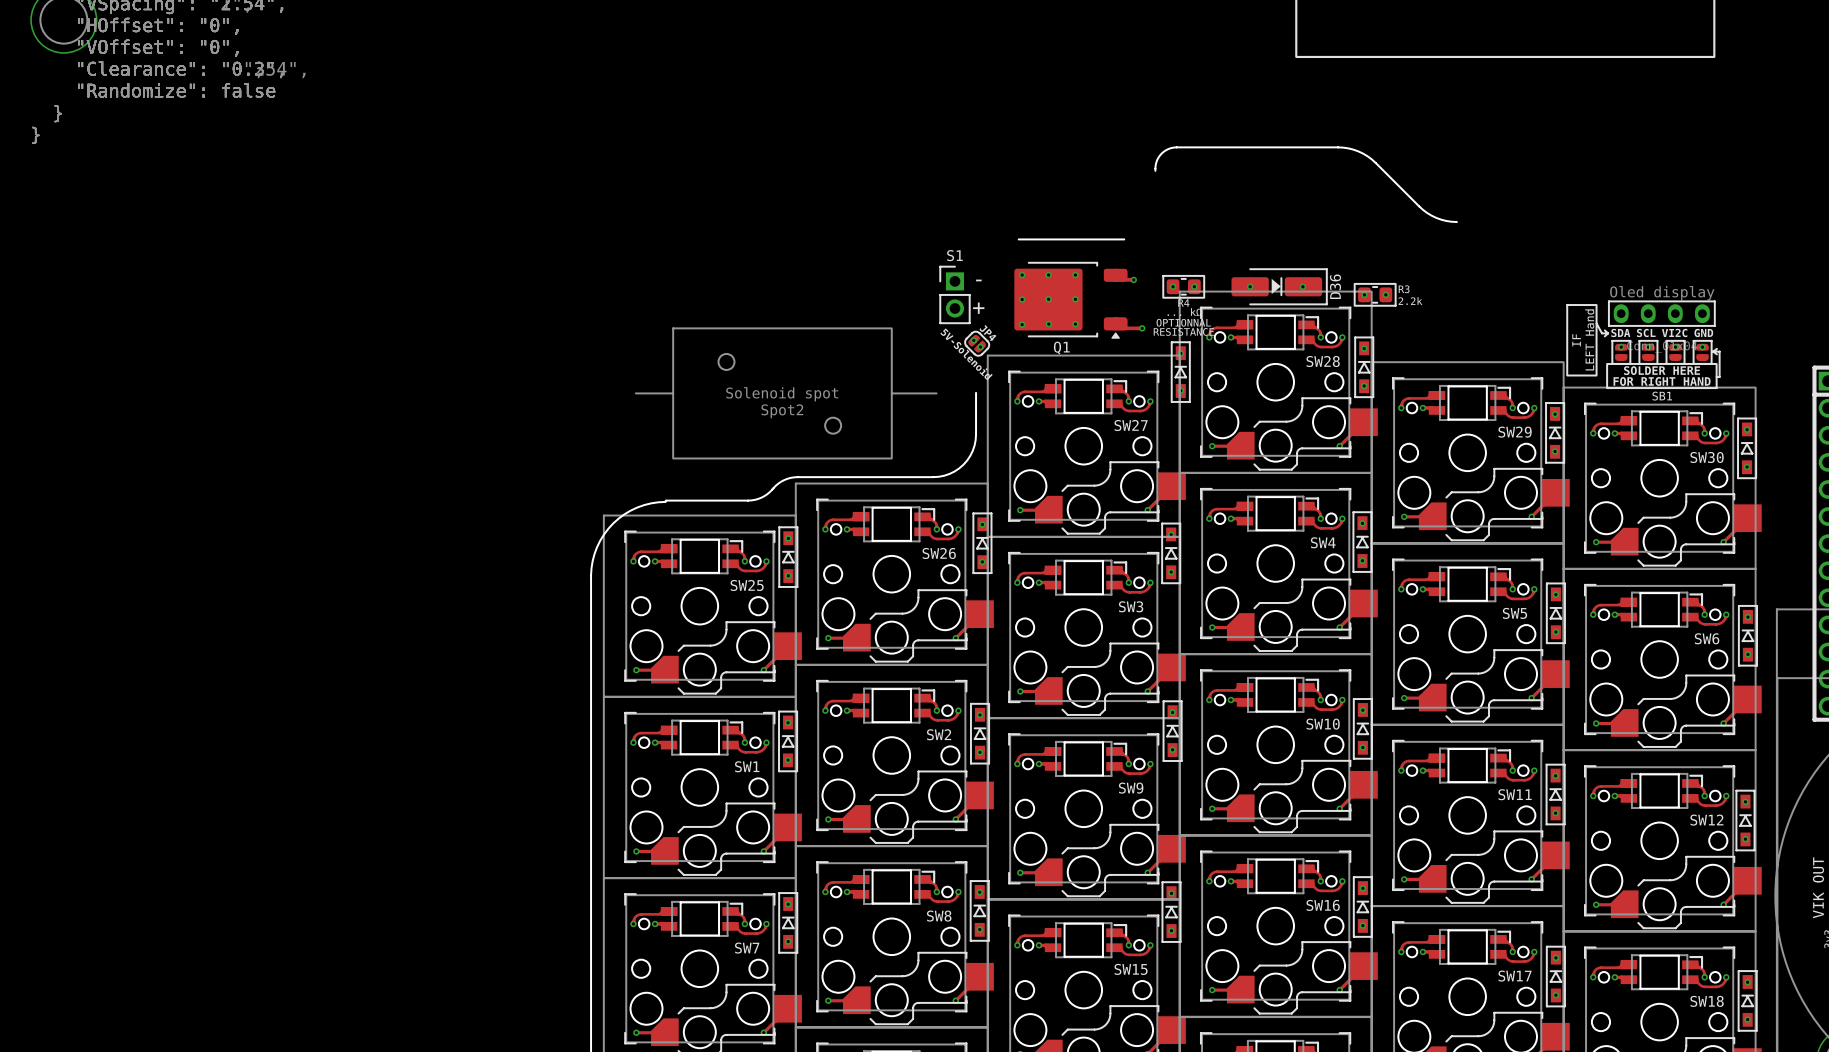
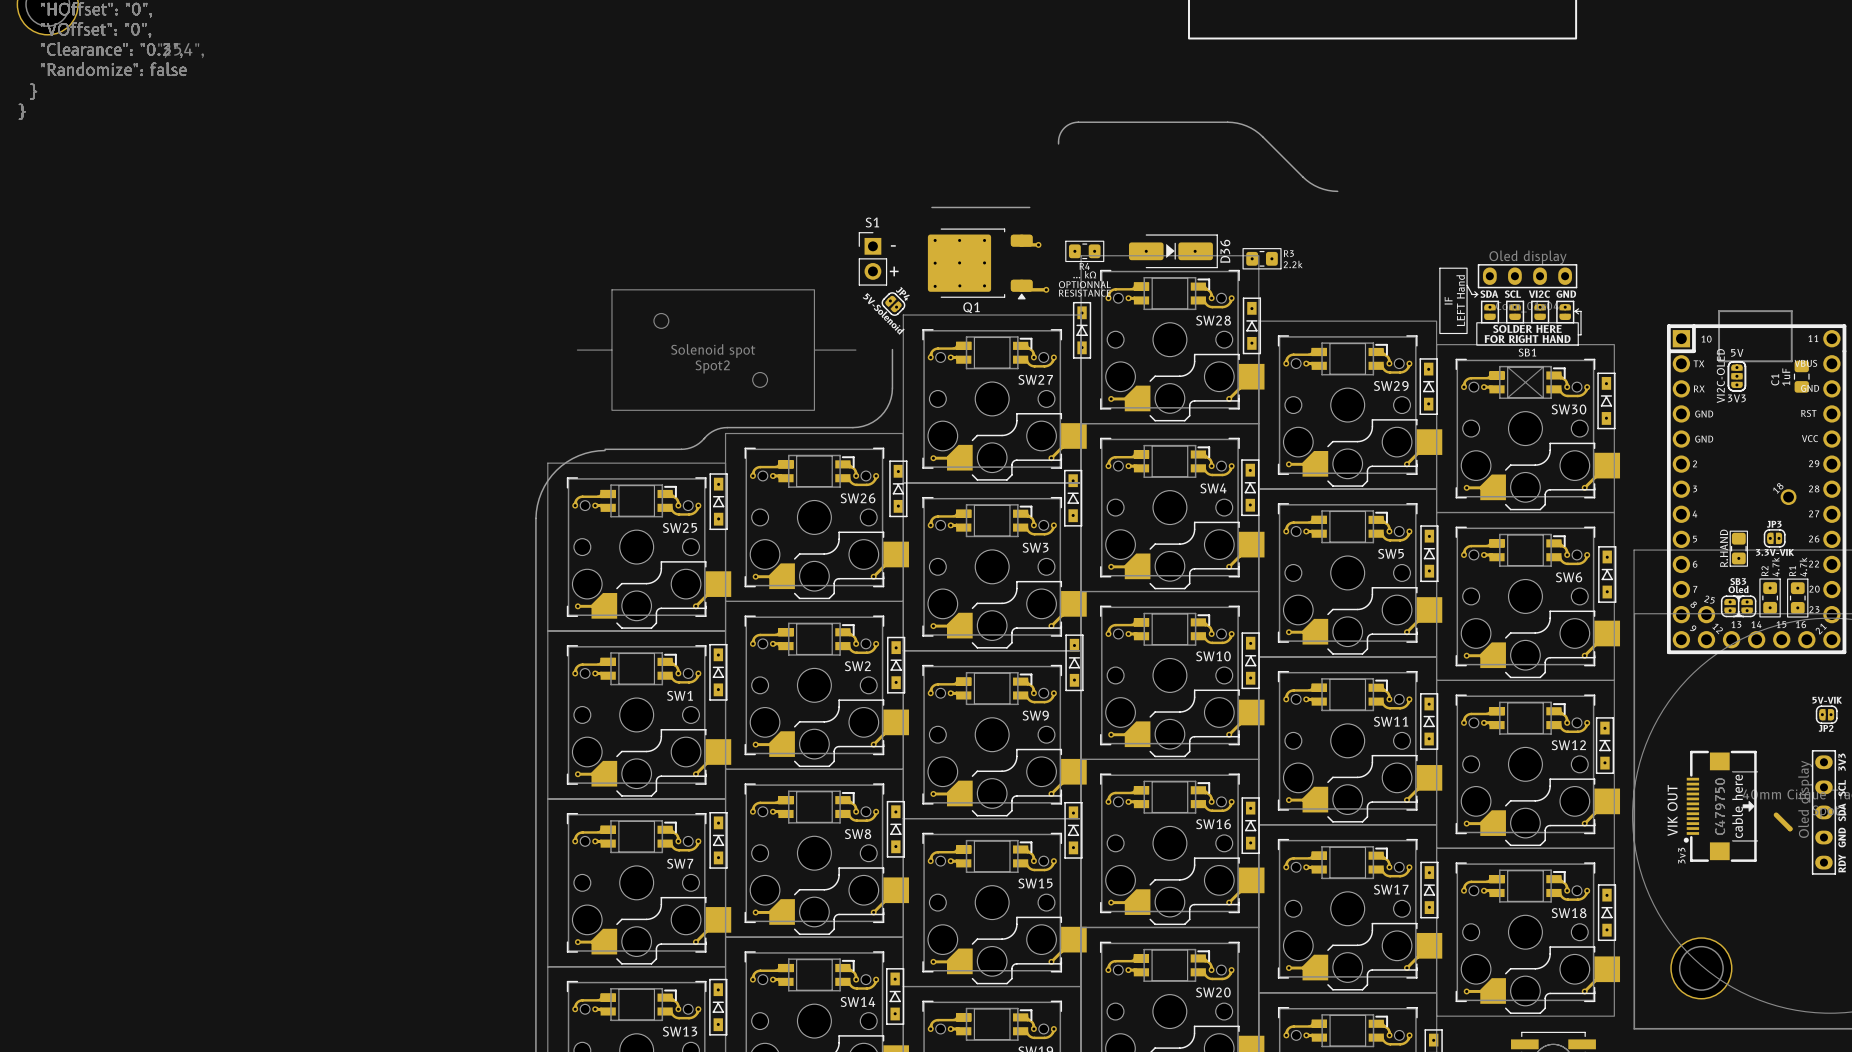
line: none -> (1543, 397) (1507, 367) (1543, 367) (1507, 397)

